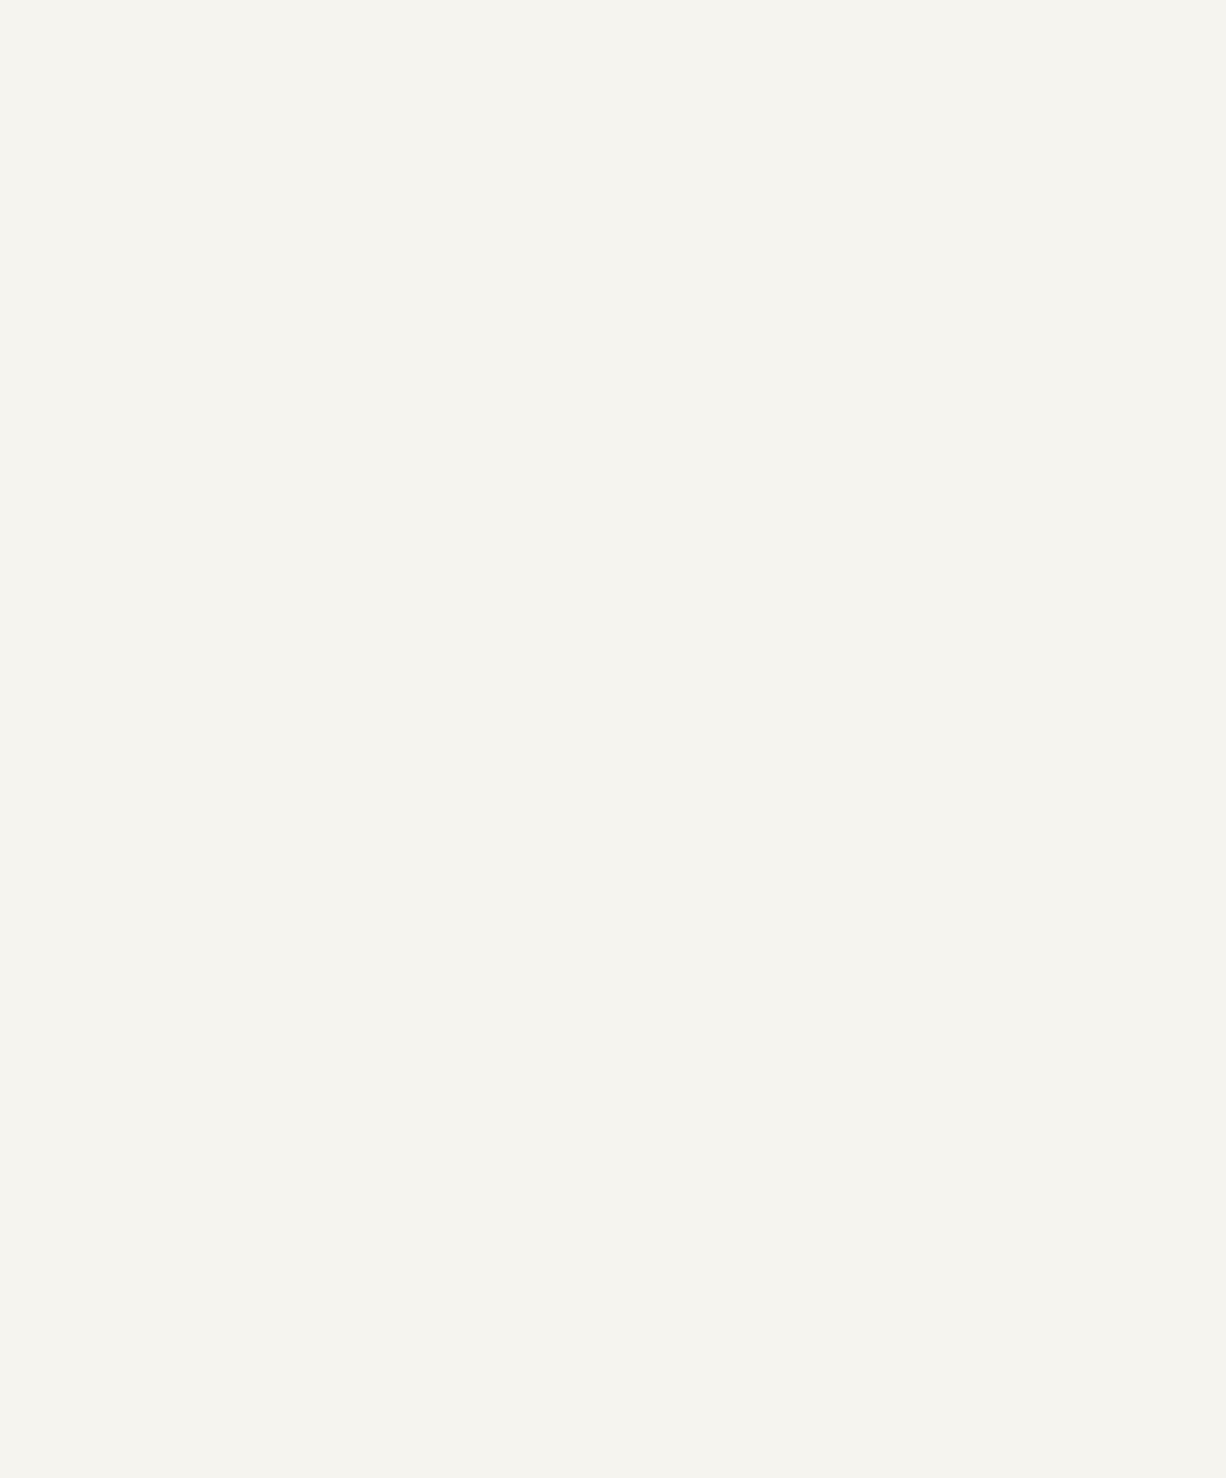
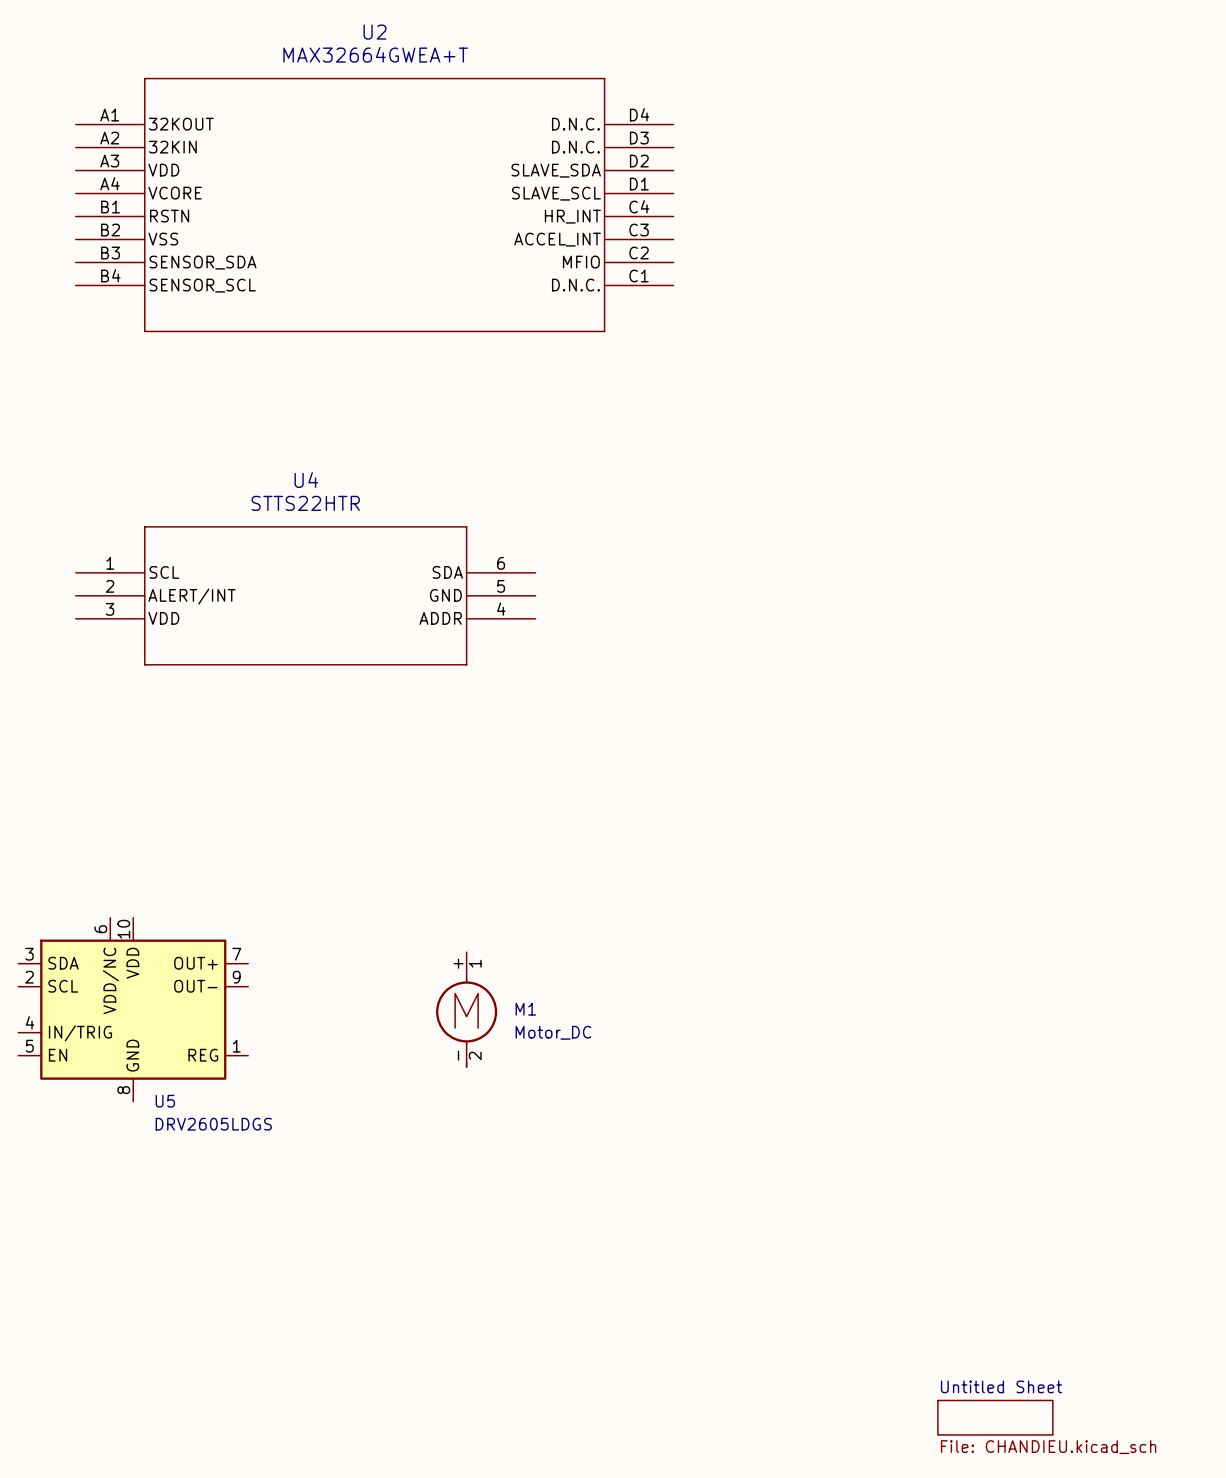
U2: none -> MAX32664GWEA+T (374, 205)
U4: none -> STTS22HTR (305, 595)
U5: none -> DRV2605LDGS (133, 1009)
M1: none -> Motor_DC (466, 1009)
sheet Untitled Sheet: none -> File: CHANDIEU.kicad_sch (995, 1417)

